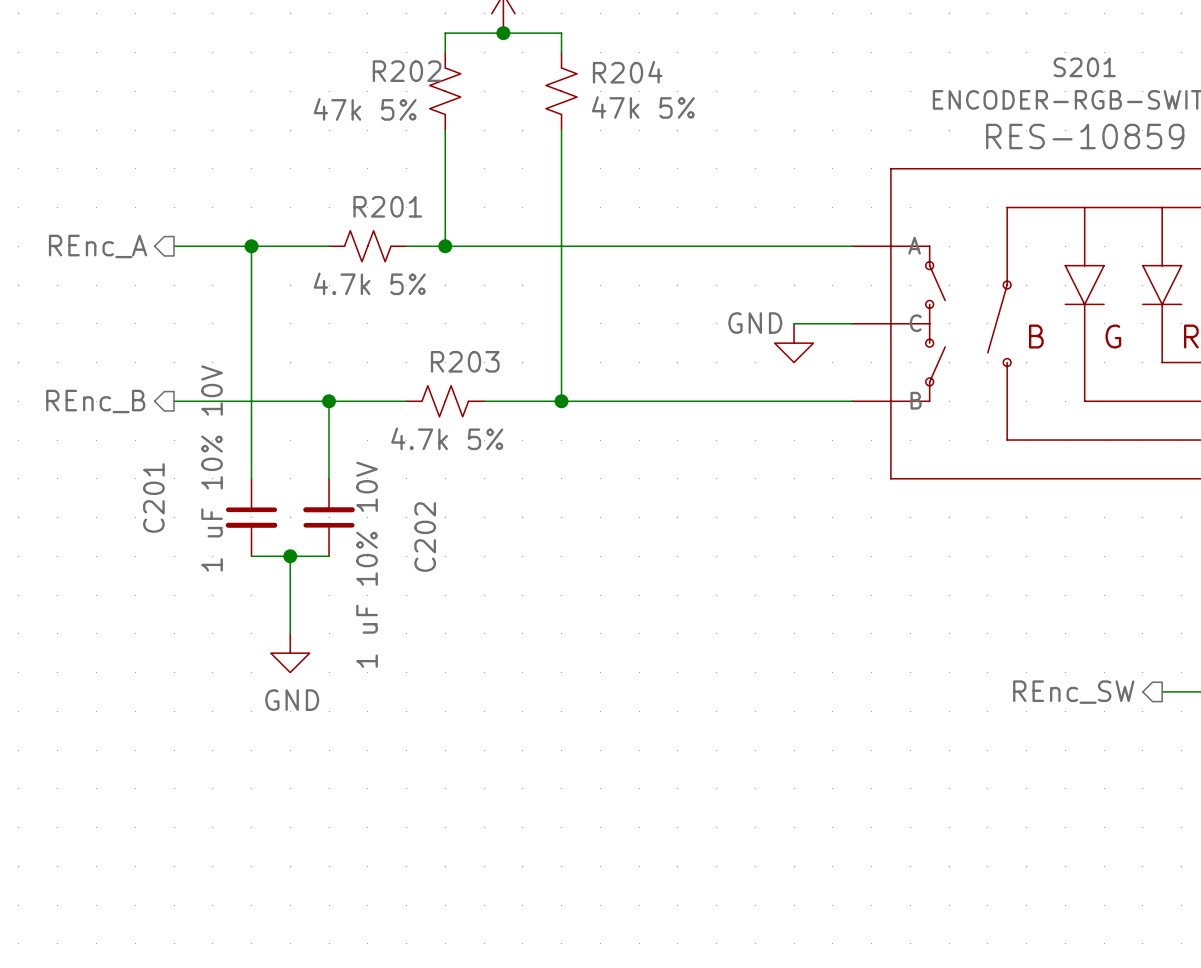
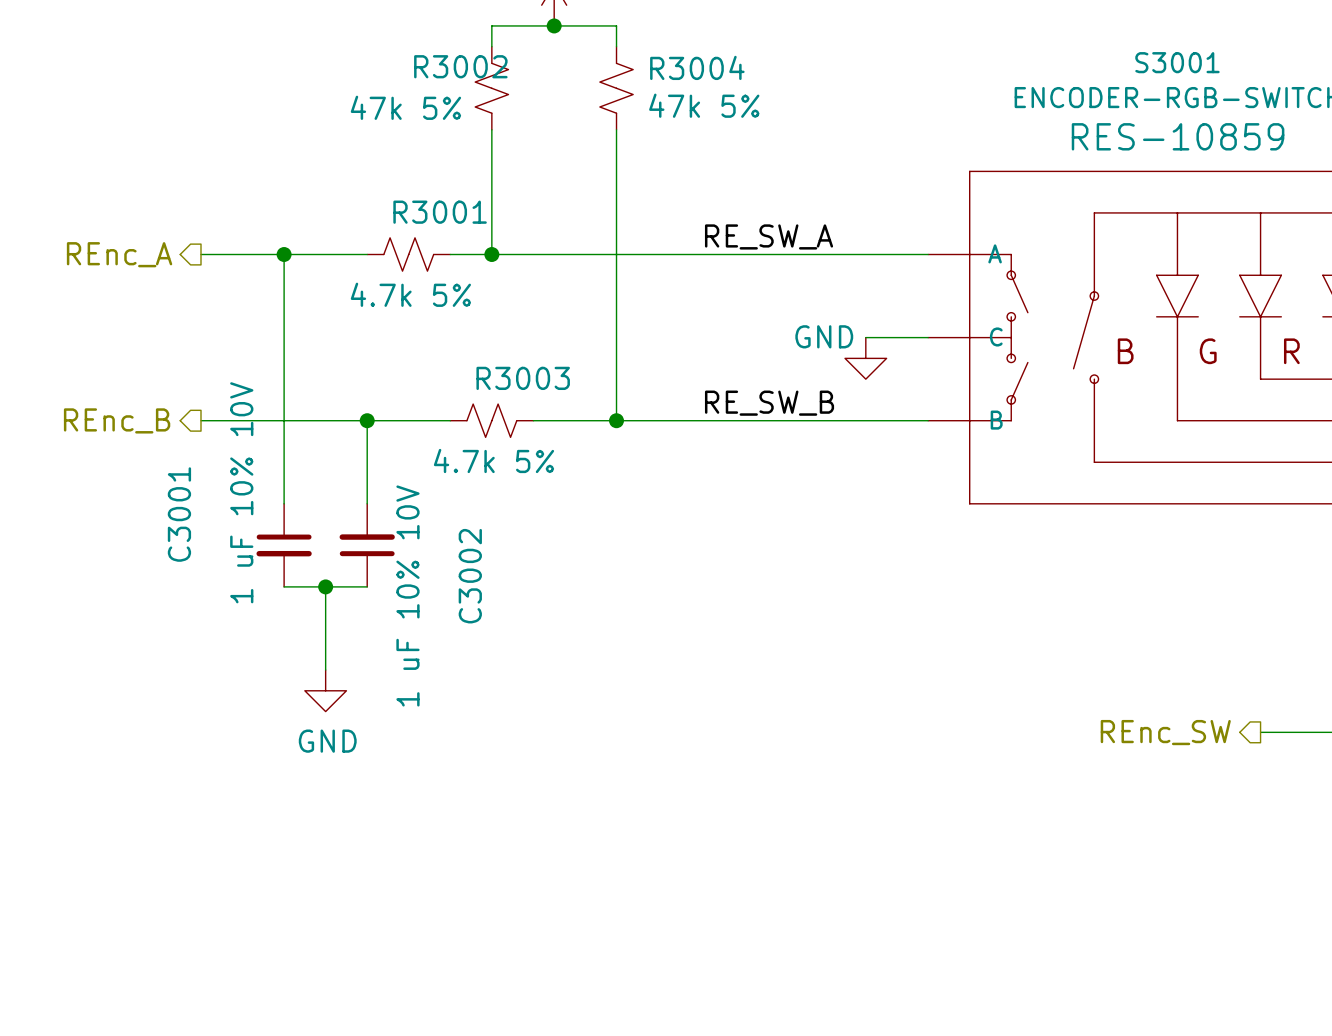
S201 name: S201 (1084, 67) -> S3001 (1177, 62)
R202 name: R202 (407, 71) -> R3002 (460, 66)
R204 name: R204 (627, 72) -> R3004 (697, 67)
R201 name: R201 (387, 206) -> R3001 (440, 212)
label: none -> RE_SW_A (769, 236)
R203 name: R203 (465, 361) -> R3003 (523, 378)
label: none -> RE_SW_B (769, 403)
C201 name: C201 (153, 498) -> C3001 (179, 514)
C202 name: C202 (425, 537) -> C3002 (470, 576)

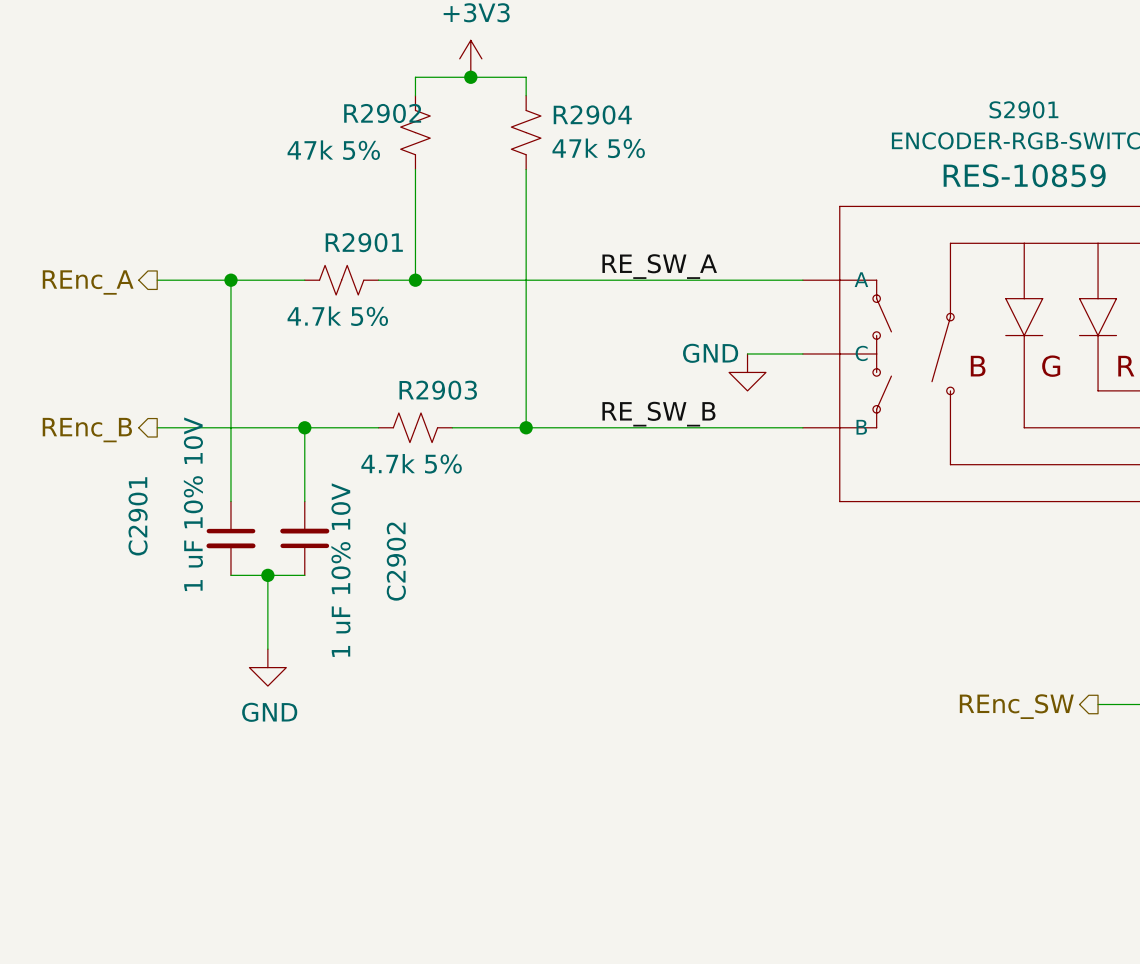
S3001 name: S3001 (1177, 62) -> S2901 (1023, 109)
R3002 name: R3002 (460, 66) -> R2902 (382, 113)
R3004 name: R3004 (697, 67) -> R2904 (592, 114)
R3001 name: R3001 (440, 212) -> R2901 (364, 242)
R3003 name: R3003 (523, 378) -> R2903 (438, 390)
C3001 name: C3001 (179, 514) -> C2901 (138, 516)
C3002 name: C3002 (470, 576) -> C2902 (396, 561)

